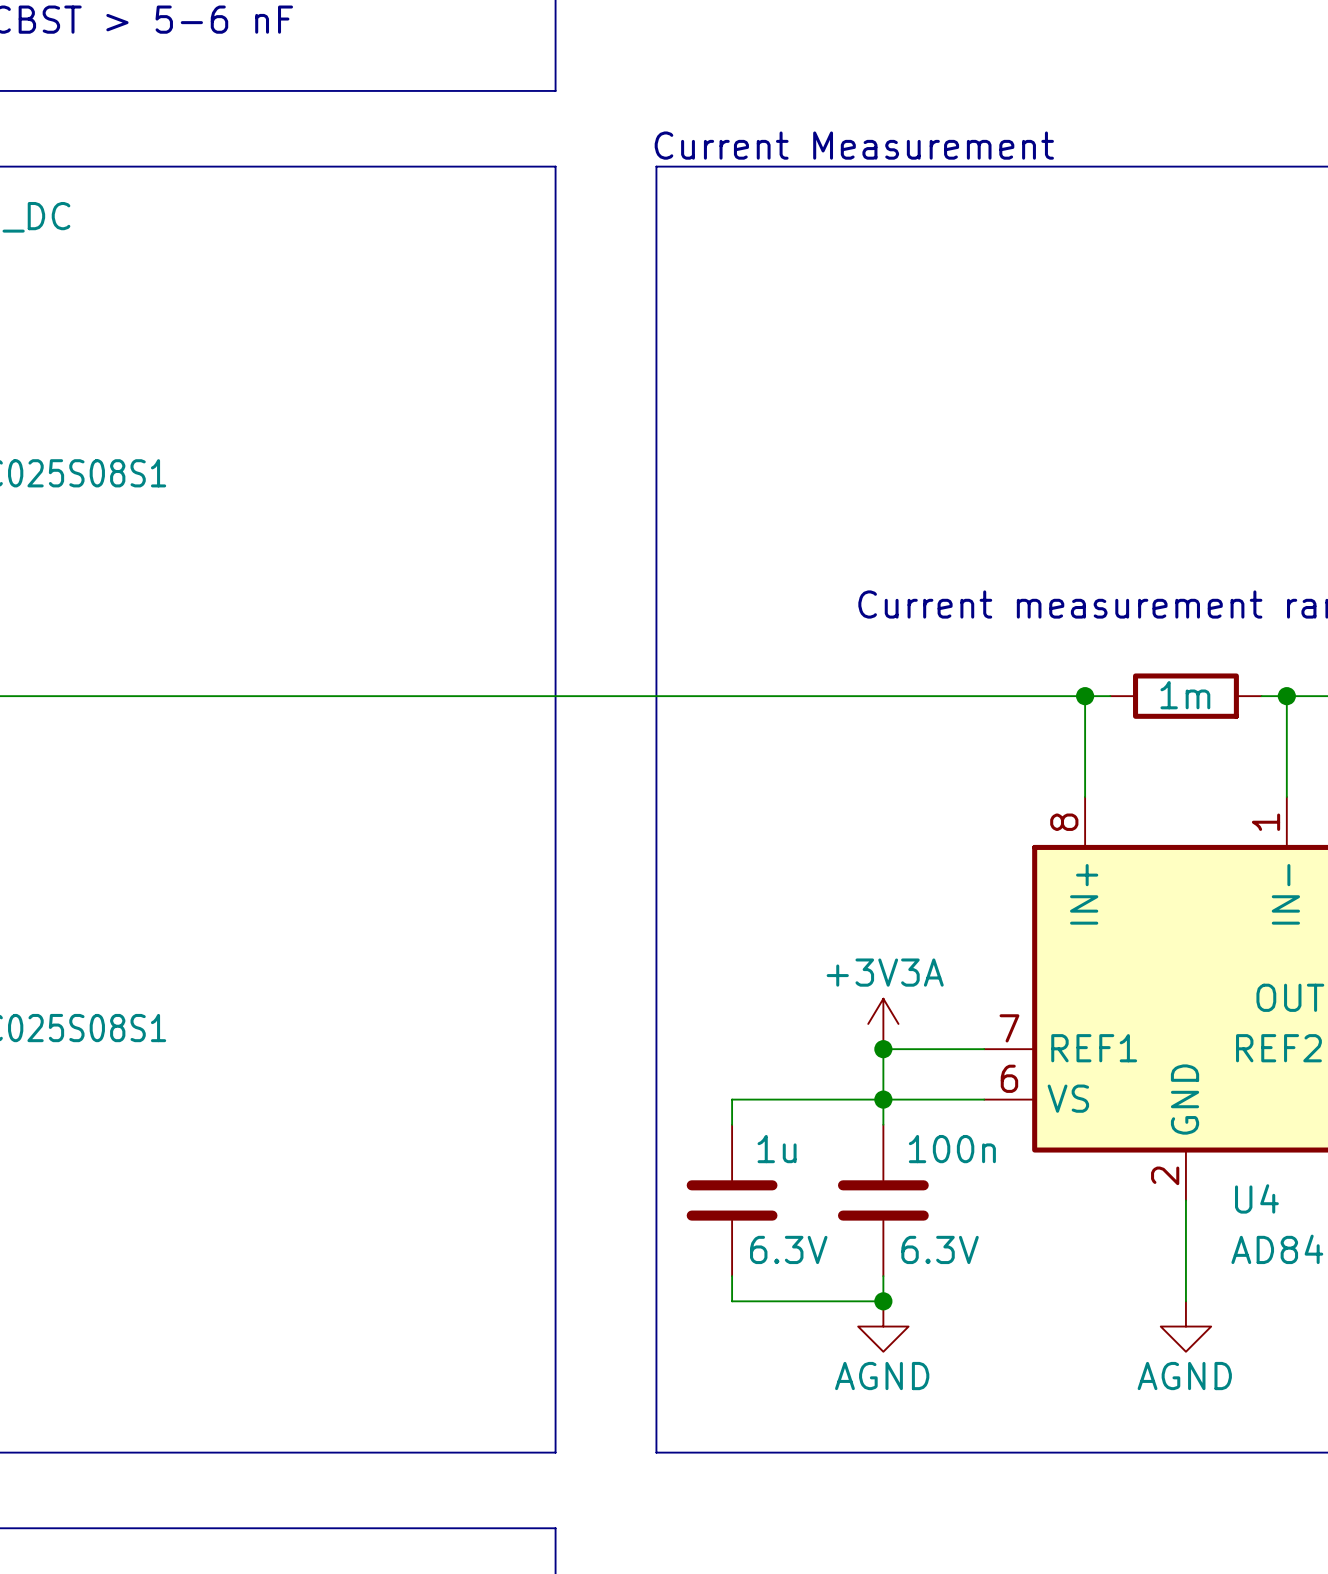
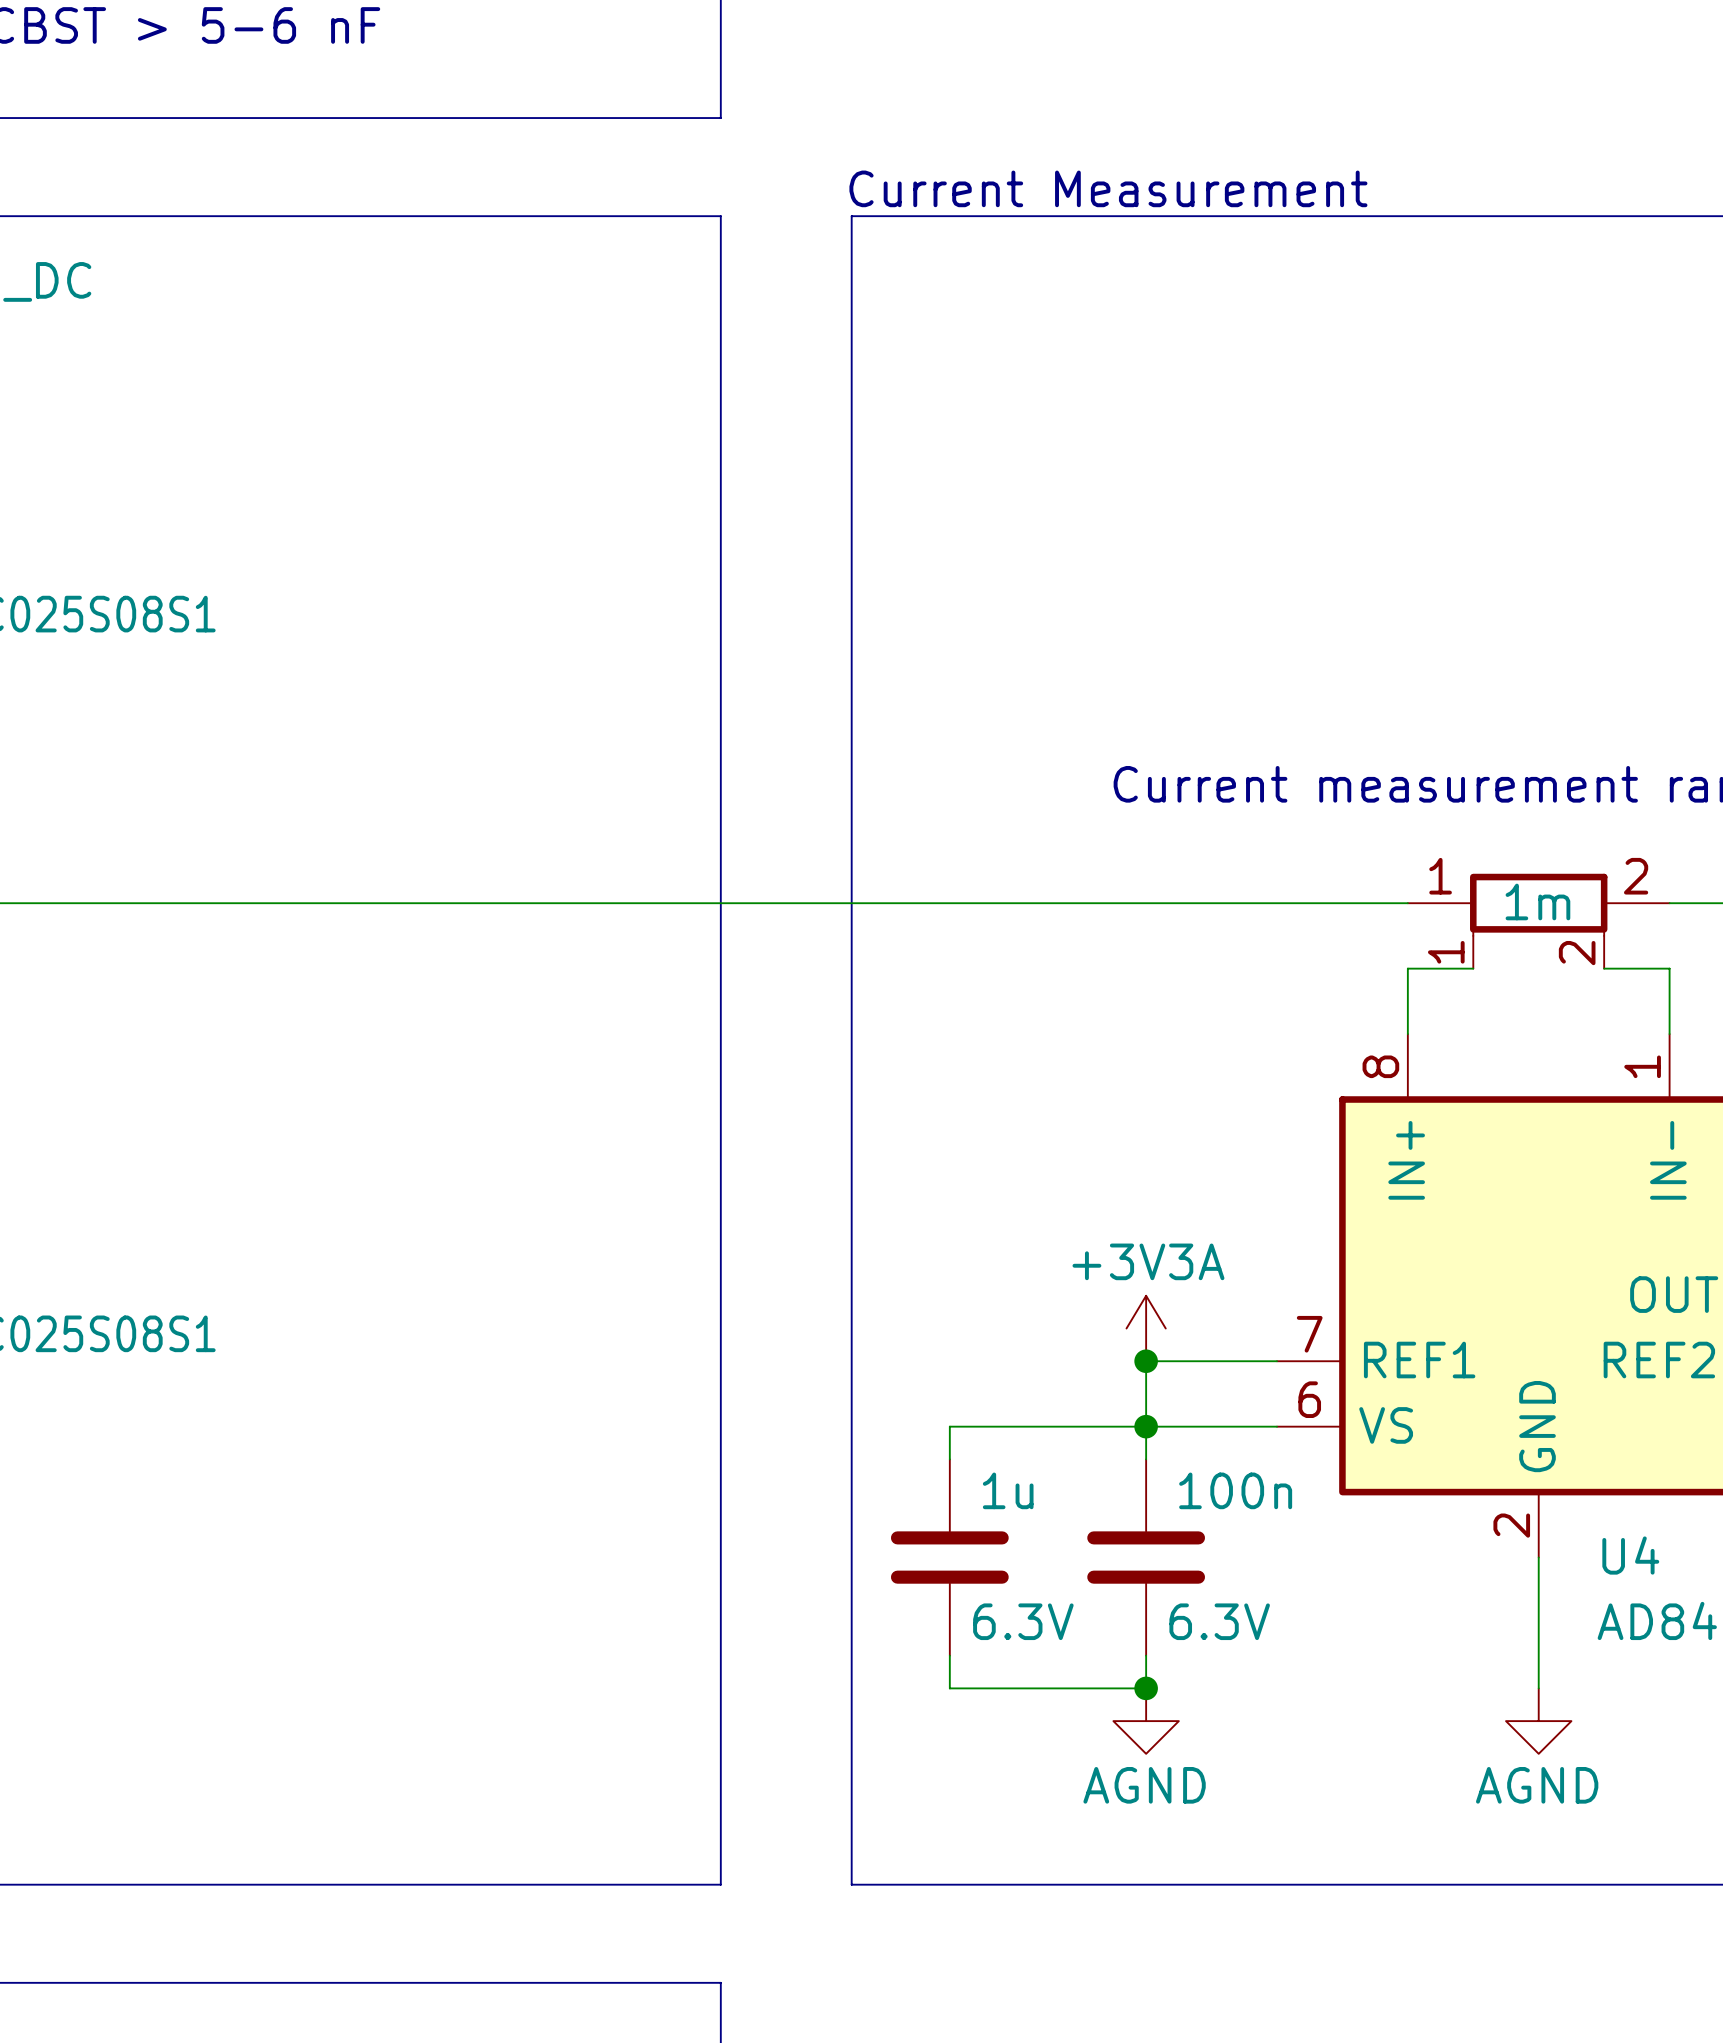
part symbol: [1110, 673, 1262, 719] -> [1407, 873, 1670, 969]
junction: (1085, 696) -> none
wire: (1110, 696) (1085, 696) (1085, 746) -> (1473, 968) (1407, 968)
wire: (1261, 696) (1286, 696) (1286, 746) -> (1604, 968) (1669, 968)
junction: (1286, 696) -> none

